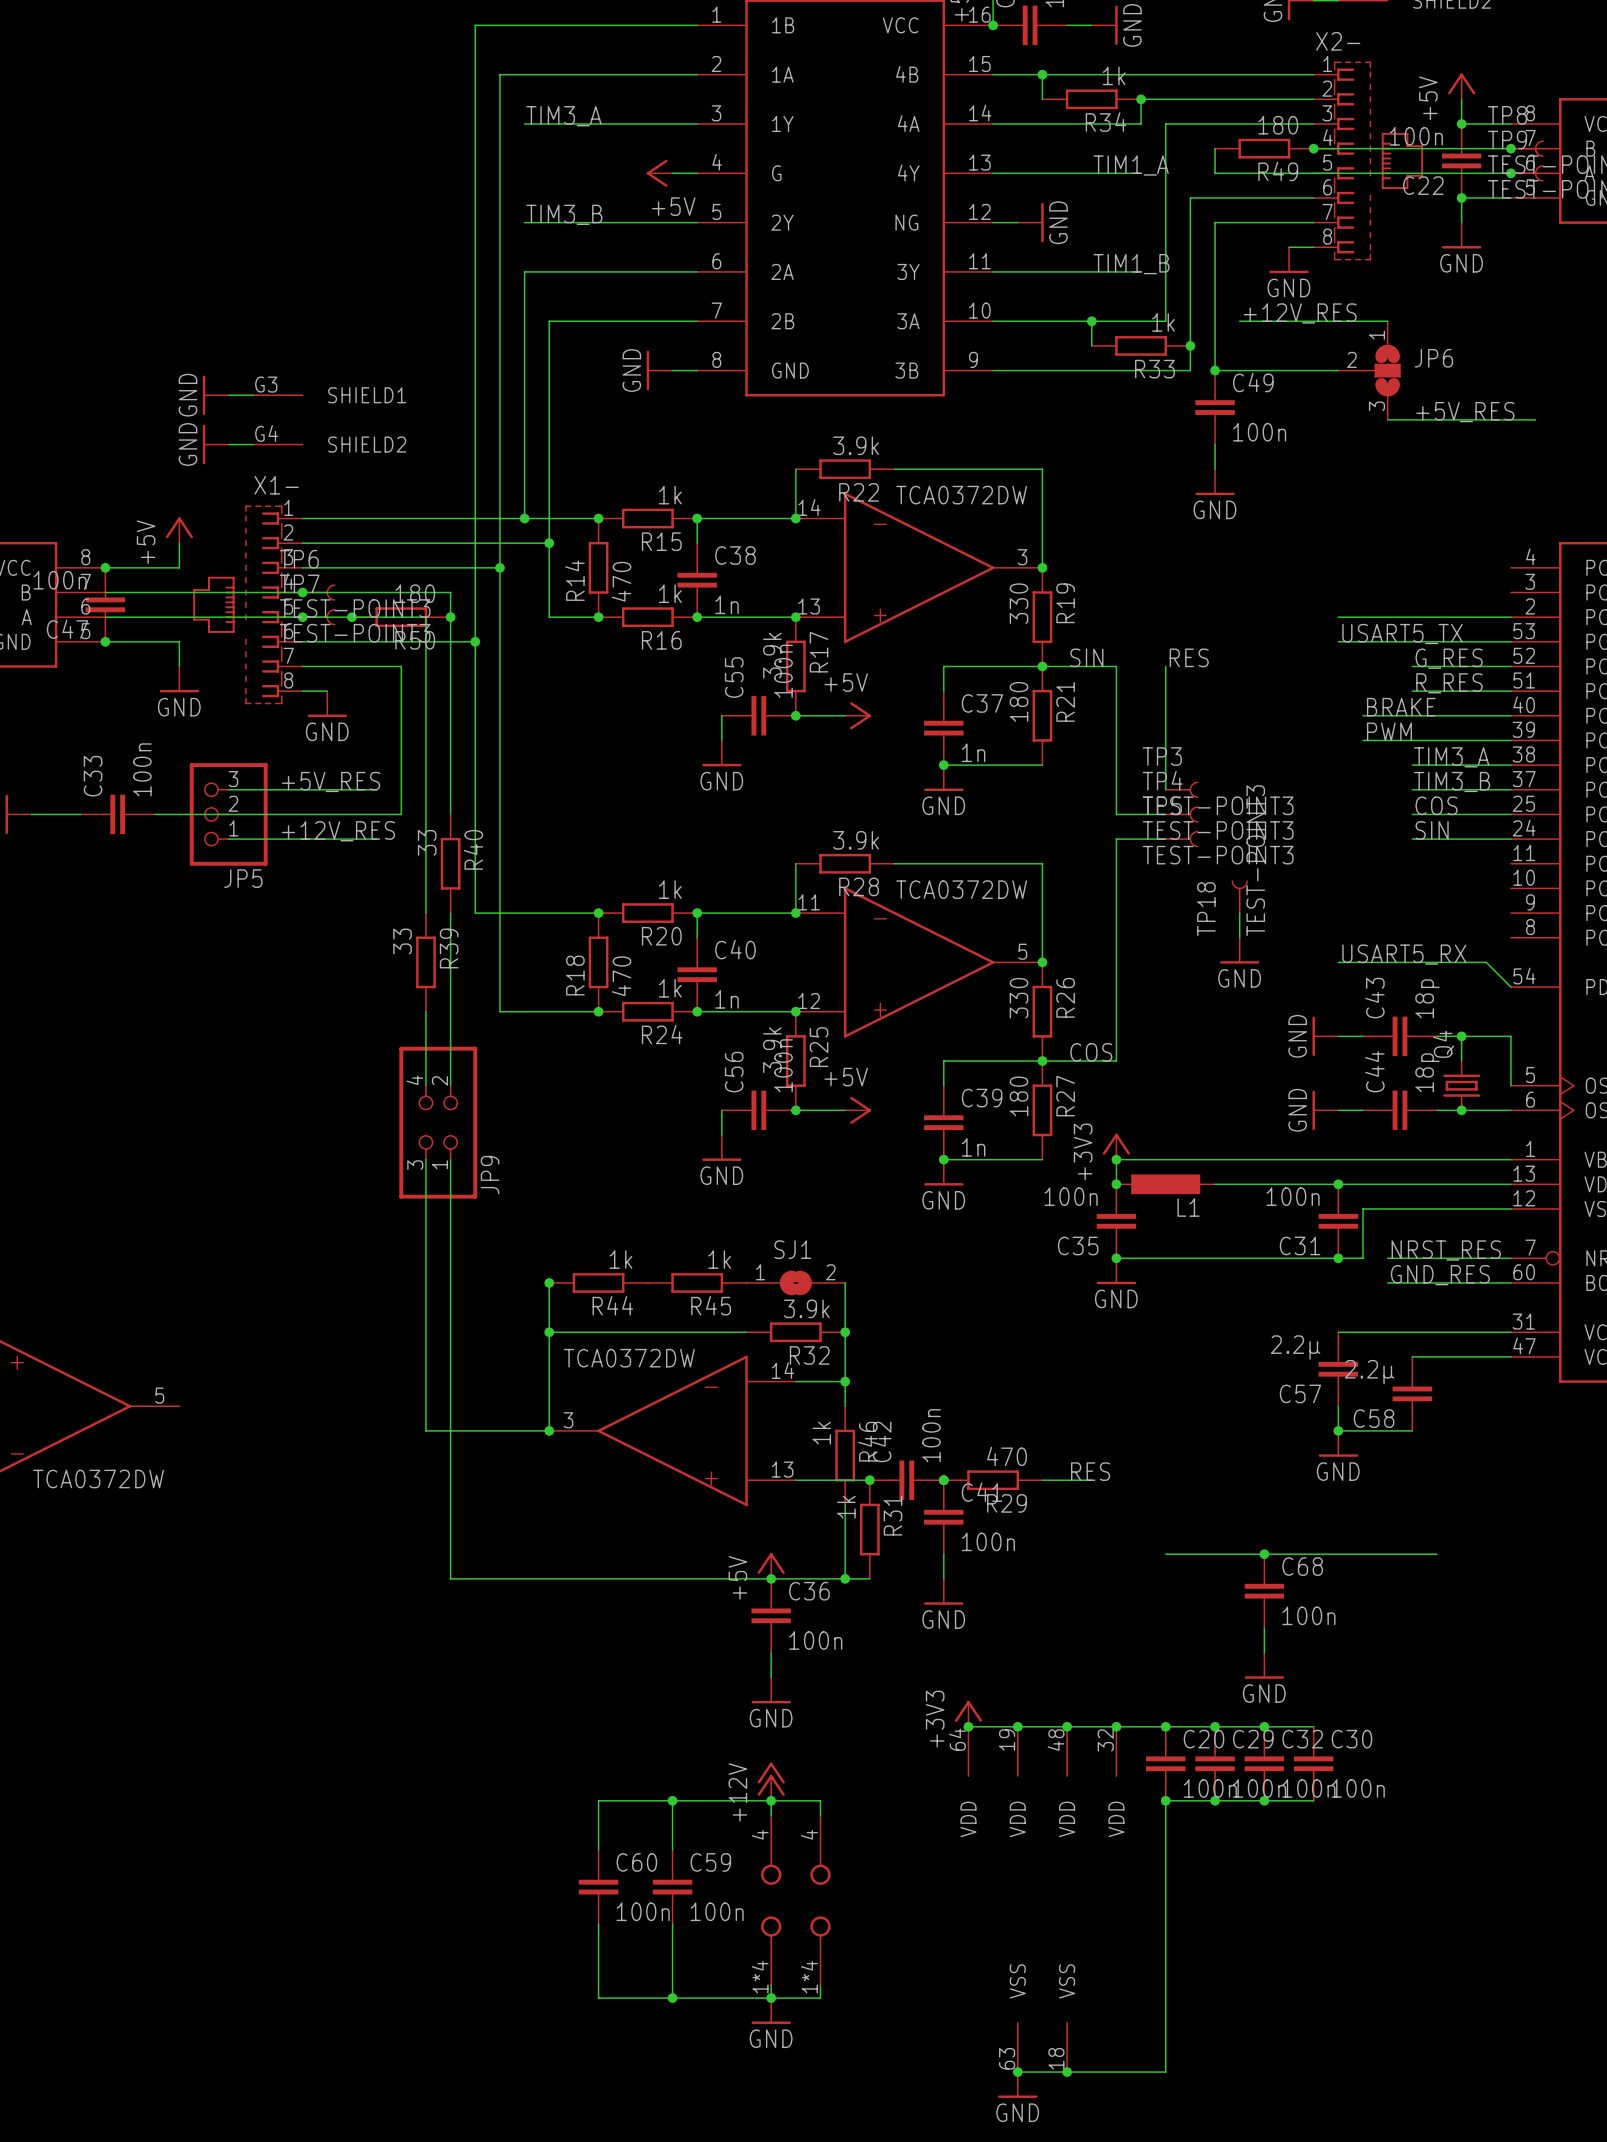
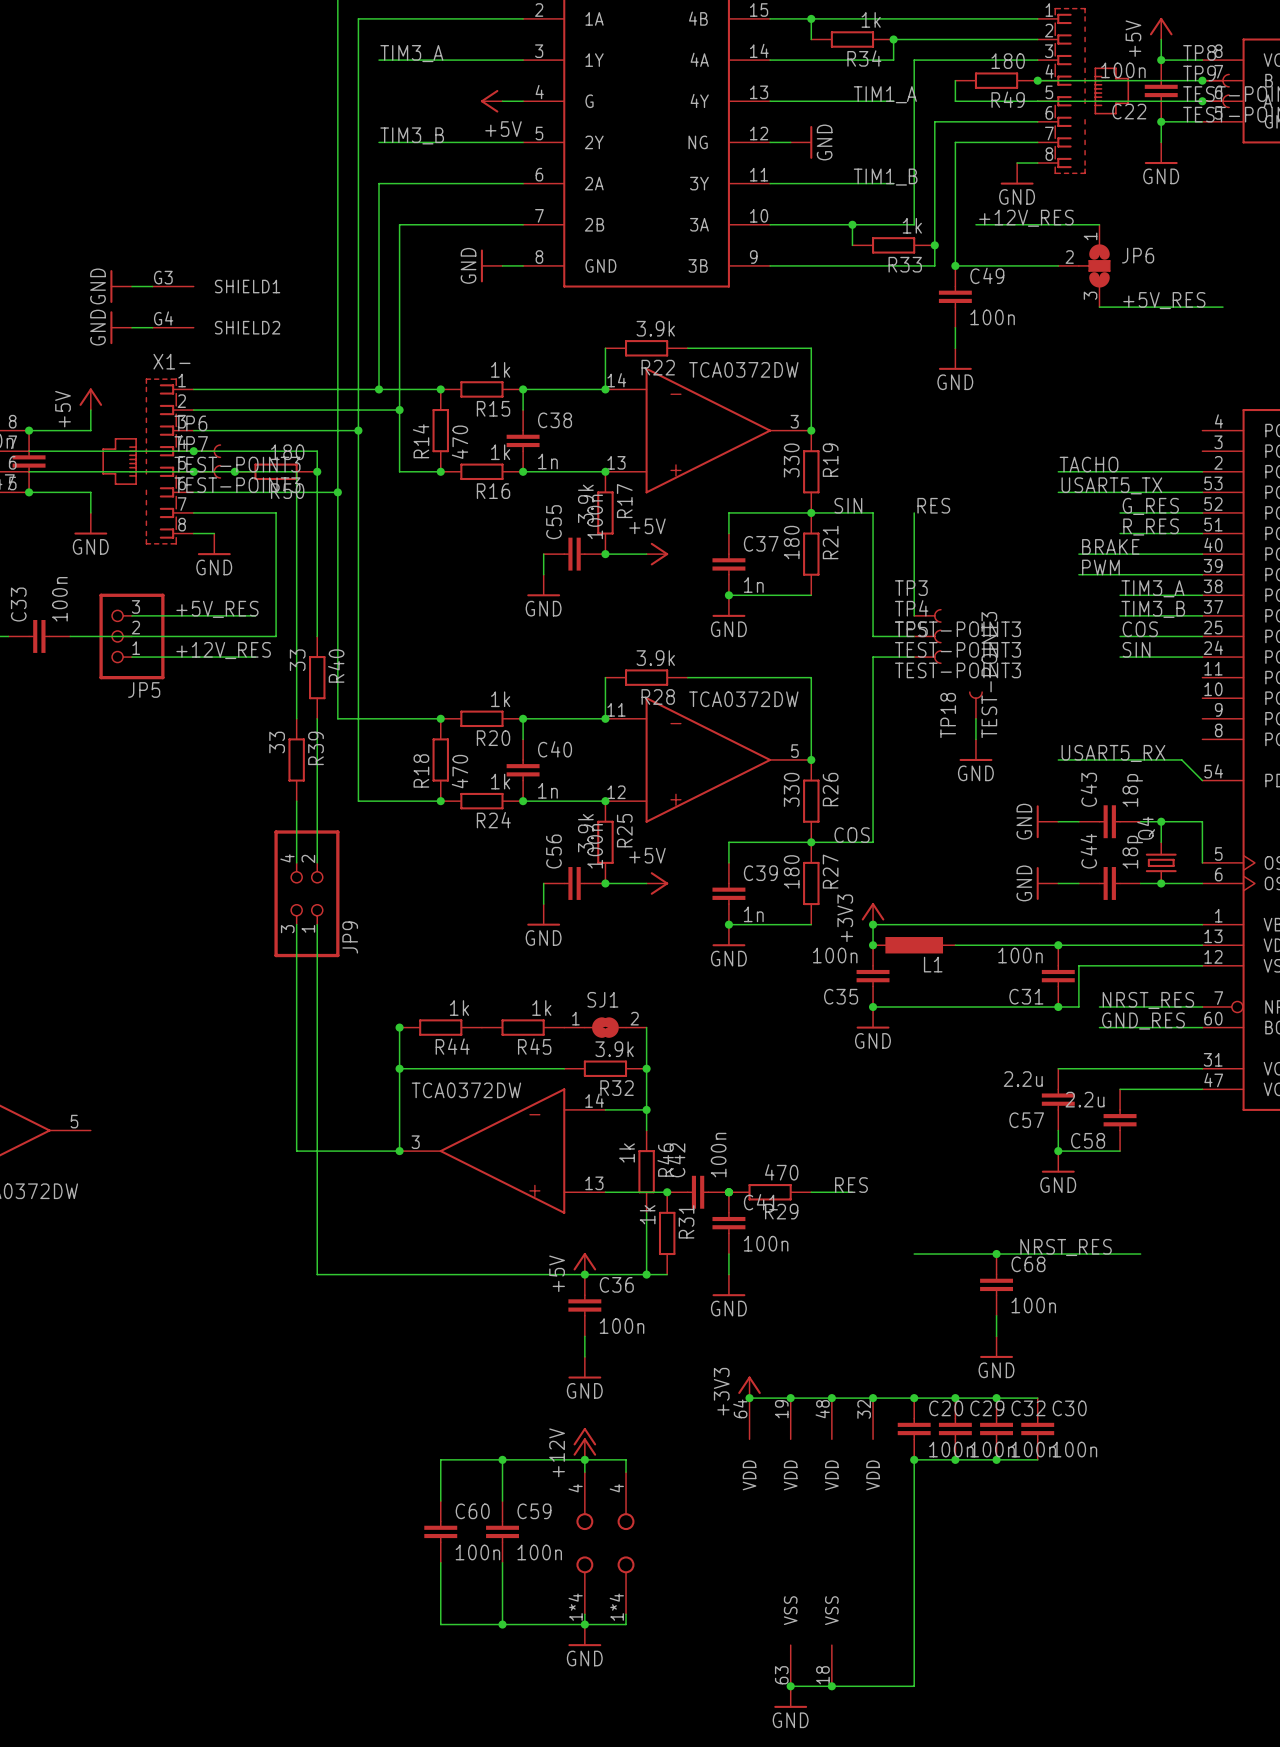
label: none -> TACHO (1089, 464)
C57 value: 2.2µ (1295, 1347) -> 2.2u (1023, 1079)
C58 value: 2.2µ (1369, 1372) -> 2.2u (1085, 1099)
label: none -> NRST_RES (1066, 1247)

